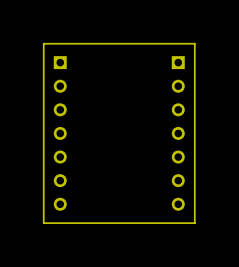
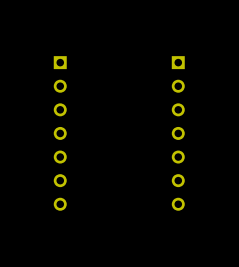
board edge: (194, 43) (194, 223) (43, 223) (43, 43) (194, 43) -> none

